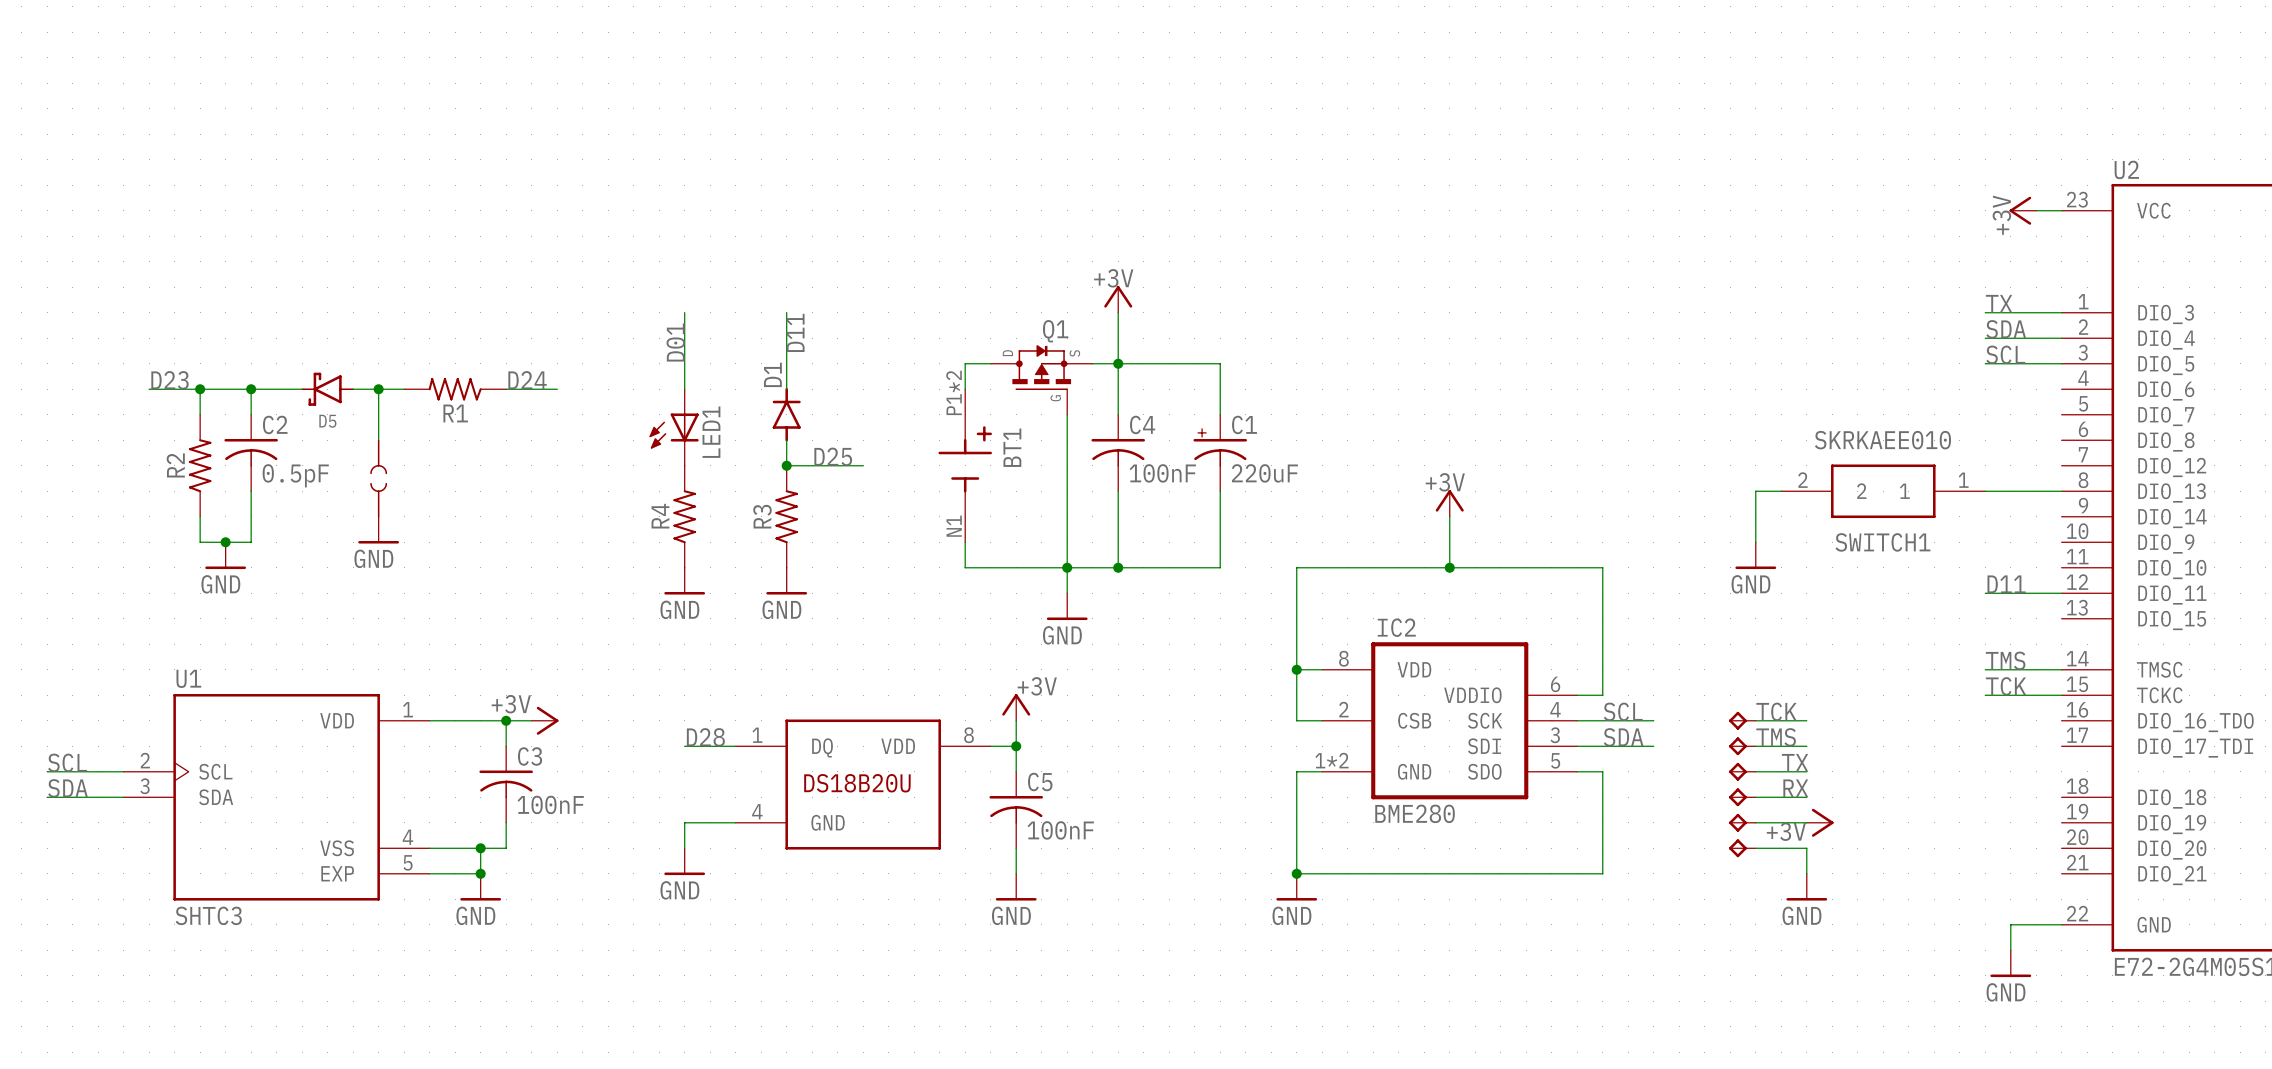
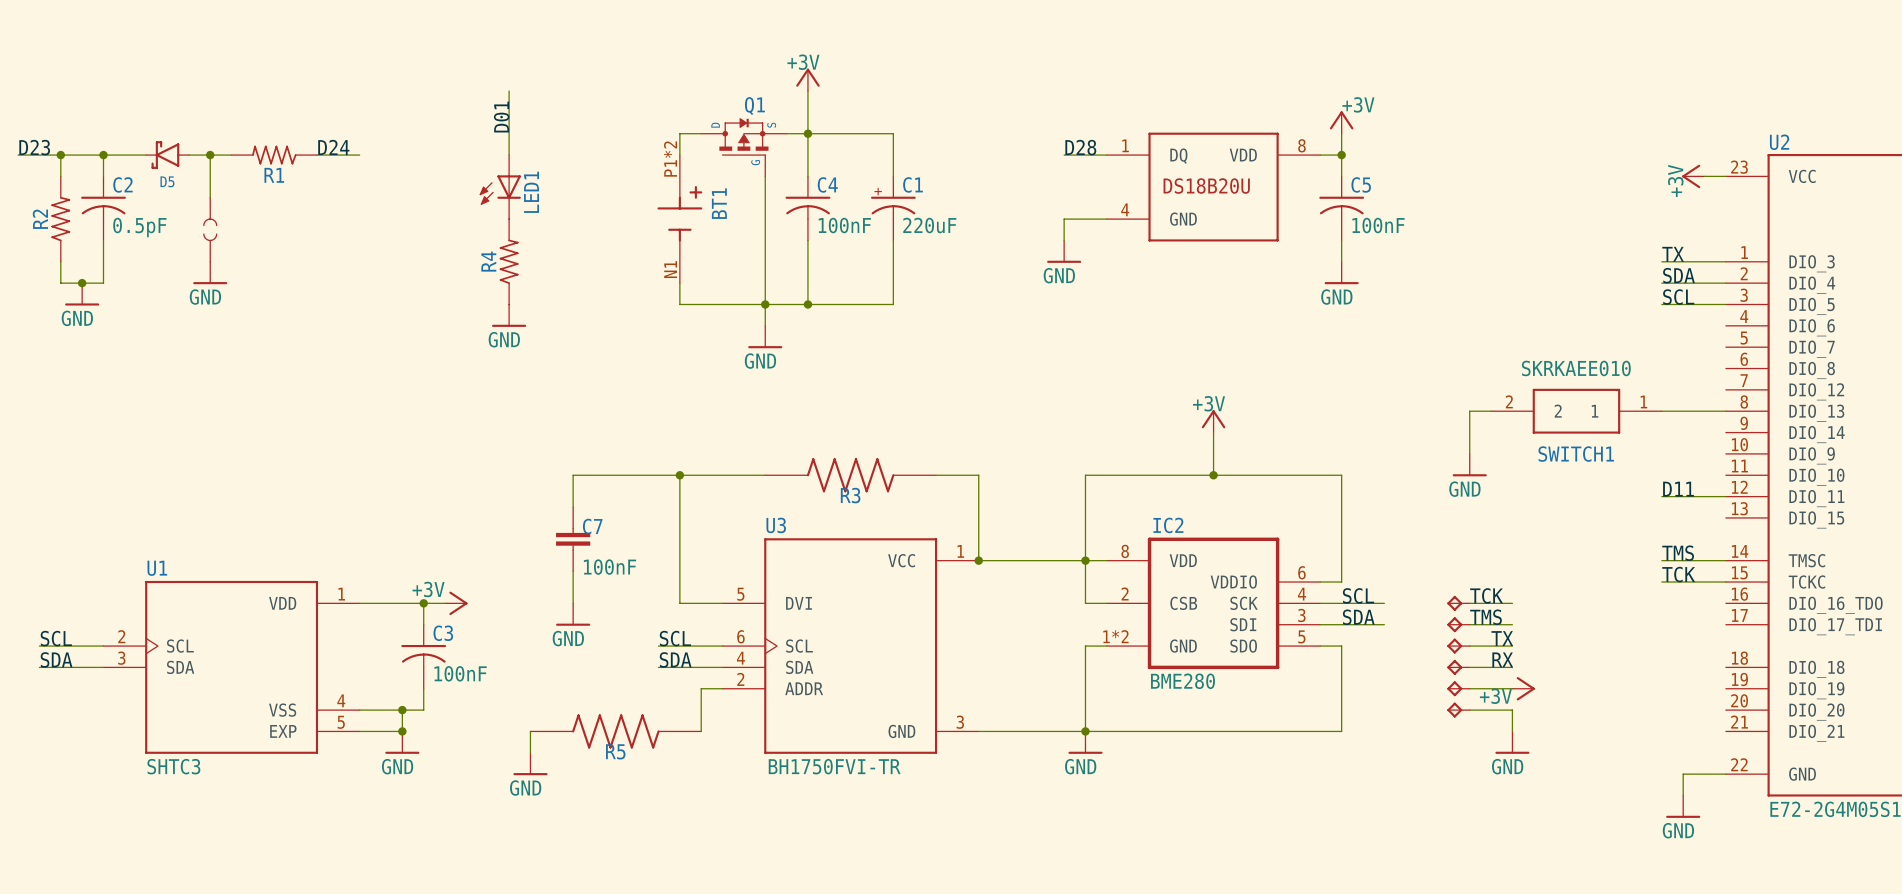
power symbol: none -> +3V (807, 79)
wire: none -> (807, 91) (807, 176)
power symbol: none -> +3V (1341, 122)
wire: none -> (701, 133) (679, 133) (679, 155)
wire: none -> (786, 133) (893, 133) (893, 176)
junction: none -> (807, 133)
wire: none -> (1341, 133) (1341, 176)
label: none -> D28 (1080, 147)
junction: none -> (60, 155)
junction: none -> (103, 155)
junction: none -> (210, 155)
wire: none -> (1064, 155) (1106, 155)
wire: none -> (1320, 155) (1341, 155)
junction: none -> (1341, 155)
wire: none -> (765, 176) (765, 325)
part: none -> (1213, 187)
part: none -> (210, 211)
wire: none -> (1106, 219) (1064, 219) (1064, 240)
wire: none -> (807, 240) (807, 304) (679, 304) (679, 283)
wire: none -> (893, 240) (893, 304) (829, 304)
wire: none -> (1341, 240) (1341, 261)
part: none -> (210, 247)
power symbol: +3V (1118, 299) -> none
power symbol: none -> GND (1064, 251)
wire: (684, 312) (684, 389) -> (509, 91) (509, 155)
wire: (786, 312) (786, 389) -> none
wire: (1118, 312) (1118, 414) -> none
power symbol: none -> GND (210, 273)
power symbol: none -> GND (1341, 273)
label: D11 (795, 332) -> none
junction: none -> (82, 283)
label position: D01 (675, 342) -> D01 (501, 117)
power symbol: none -> GND (82, 294)
junction: none -> (765, 304)
wire: (965, 363) (965, 389) -> none
junction: none -> (807, 304)
wire: (1092, 363) (1220, 363) (1220, 414) -> none
junction: (1118, 363) -> none
power symbol: none -> GND (509, 315)
Q1 position: (1041, 379) -> (743, 147)
label position: D23 (170, 380) -> D23 (34, 147)
label position: D24 (527, 380) -> D24 (333, 147)
wire: (149, 389) (302, 389) -> (18, 155) (146, 155)
wire: (200, 389) (200, 414) -> (60, 155) (60, 176)
junction: (200, 389) -> none
wire: (251, 389) (251, 414) -> (103, 155) (103, 176)
junction: (251, 389) -> none
D5 position: (327, 389) -> (167, 155)
wire: (353, 389) (404, 389) -> (188, 155) (231, 155)
wire: (378, 389) (378, 440) -> (210, 155) (210, 197)
junction: (378, 389) -> none
R1 position: (455, 389) -> (274, 155)
wire: (506, 389) (557, 389) -> (316, 155) (359, 155)
power symbol: none -> GND (765, 337)
D1: (786, 414) -> none
wire: (1067, 414) (1067, 593) -> none
LED1 position: (674, 427) -> (500, 187)
wire: (786, 440) (786, 465) (863, 465) -> none
C2 position: (251, 453) -> (103, 208)
C4 position: (1118, 453) -> (807, 208)
C1 position: (1220, 453) -> (893, 208)
part: (378, 456) -> none
label: D25 (833, 456) -> none
R2 position: (200, 465) -> (60, 219)
R3 symbol: [775, 465, 798, 568] -> [765, 458, 937, 493]
junction: (786, 465) -> none
BT1 position: (965, 465) -> (679, 219)
wire: (251, 491) (251, 542) (200, 542) (200, 516) -> (103, 240) (103, 283) (60, 283) (60, 261)
wire: (1118, 491) (1118, 567) (965, 567) (965, 542) -> none
wire: (1220, 491) (1220, 567) (1169, 567) -> (1085, 560) (978, 560) (978, 475)
part: (378, 500) -> none
R4 position: (684, 516) -> (509, 261)
R3 name position: R3 (762, 516) -> R3 (850, 495)
power symbol: GND (378, 530) -> none
junction: (225, 542) -> none
power symbol: GND (225, 555) -> none
wire: none -> (679, 475) (679, 603) (722, 603)
junction: none -> (679, 475)
wire: none -> (765, 475) (573, 475) (573, 507)
junction: (1067, 567) -> none
junction: (1118, 567) -> none
power symbol: GND (684, 581) -> none
power symbol: GND (786, 581) -> none
power symbol: GND (1067, 606) -> none
C7: none -> 100nF (573, 539)
junction: none -> (978, 560)
wire: none -> (573, 571) (573, 603)
power symbol: +3V (1016, 707) -> none
wire: (1016, 720) (1016, 771) -> none
power symbol: none -> GND (573, 614)
label: D28 (705, 737) -> none
wire: (684, 746) (735, 746) -> none
wire: (990, 746) (1016, 746) -> none
junction: (1016, 746) -> none
label: none -> SCL (675, 638)
wire: none -> (658, 646) (722, 646)
U3: none -> BH1750FVI-TR (850, 646)
part: (863, 784) -> none
label: none -> SDA (675, 659)
wire: none -> (658, 667) (722, 667)
C5 position: (1016, 810) -> (1341, 208)
wire: (735, 822) (684, 822) (684, 848) -> none
wire: none -> (722, 688) (701, 688) (701, 731)
wire: (1016, 848) (1016, 873) -> none
power symbol: GND (684, 861) -> none
wire: none -> (530, 731) (530, 752)
R5: none -> (615, 731)
wire: none -> (978, 731) (1085, 731)
power symbol: GND (1016, 887) -> none
power symbol: none -> GND (530, 763)

